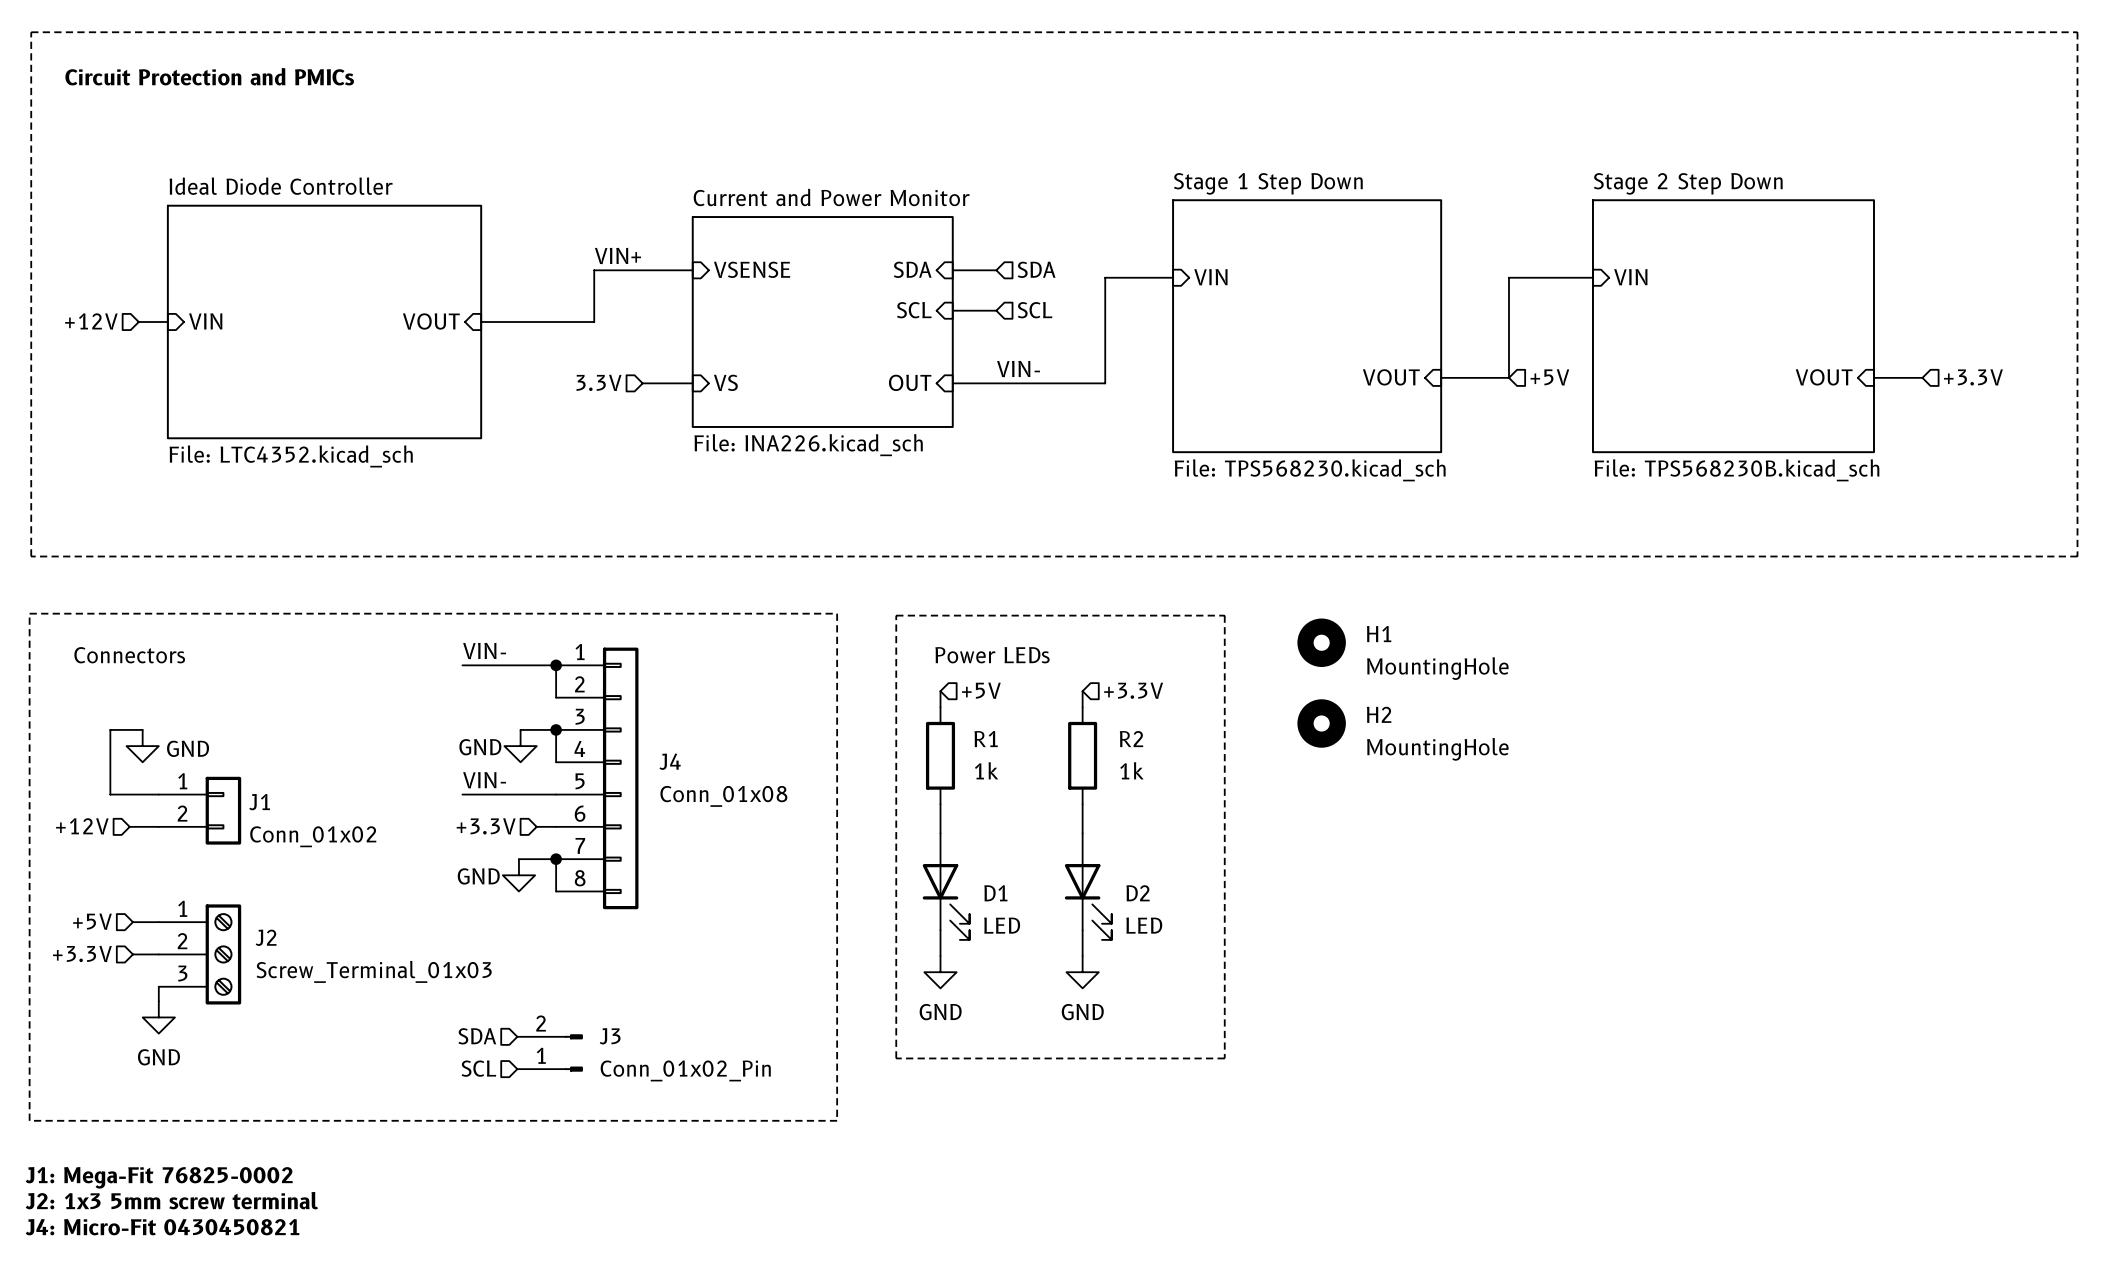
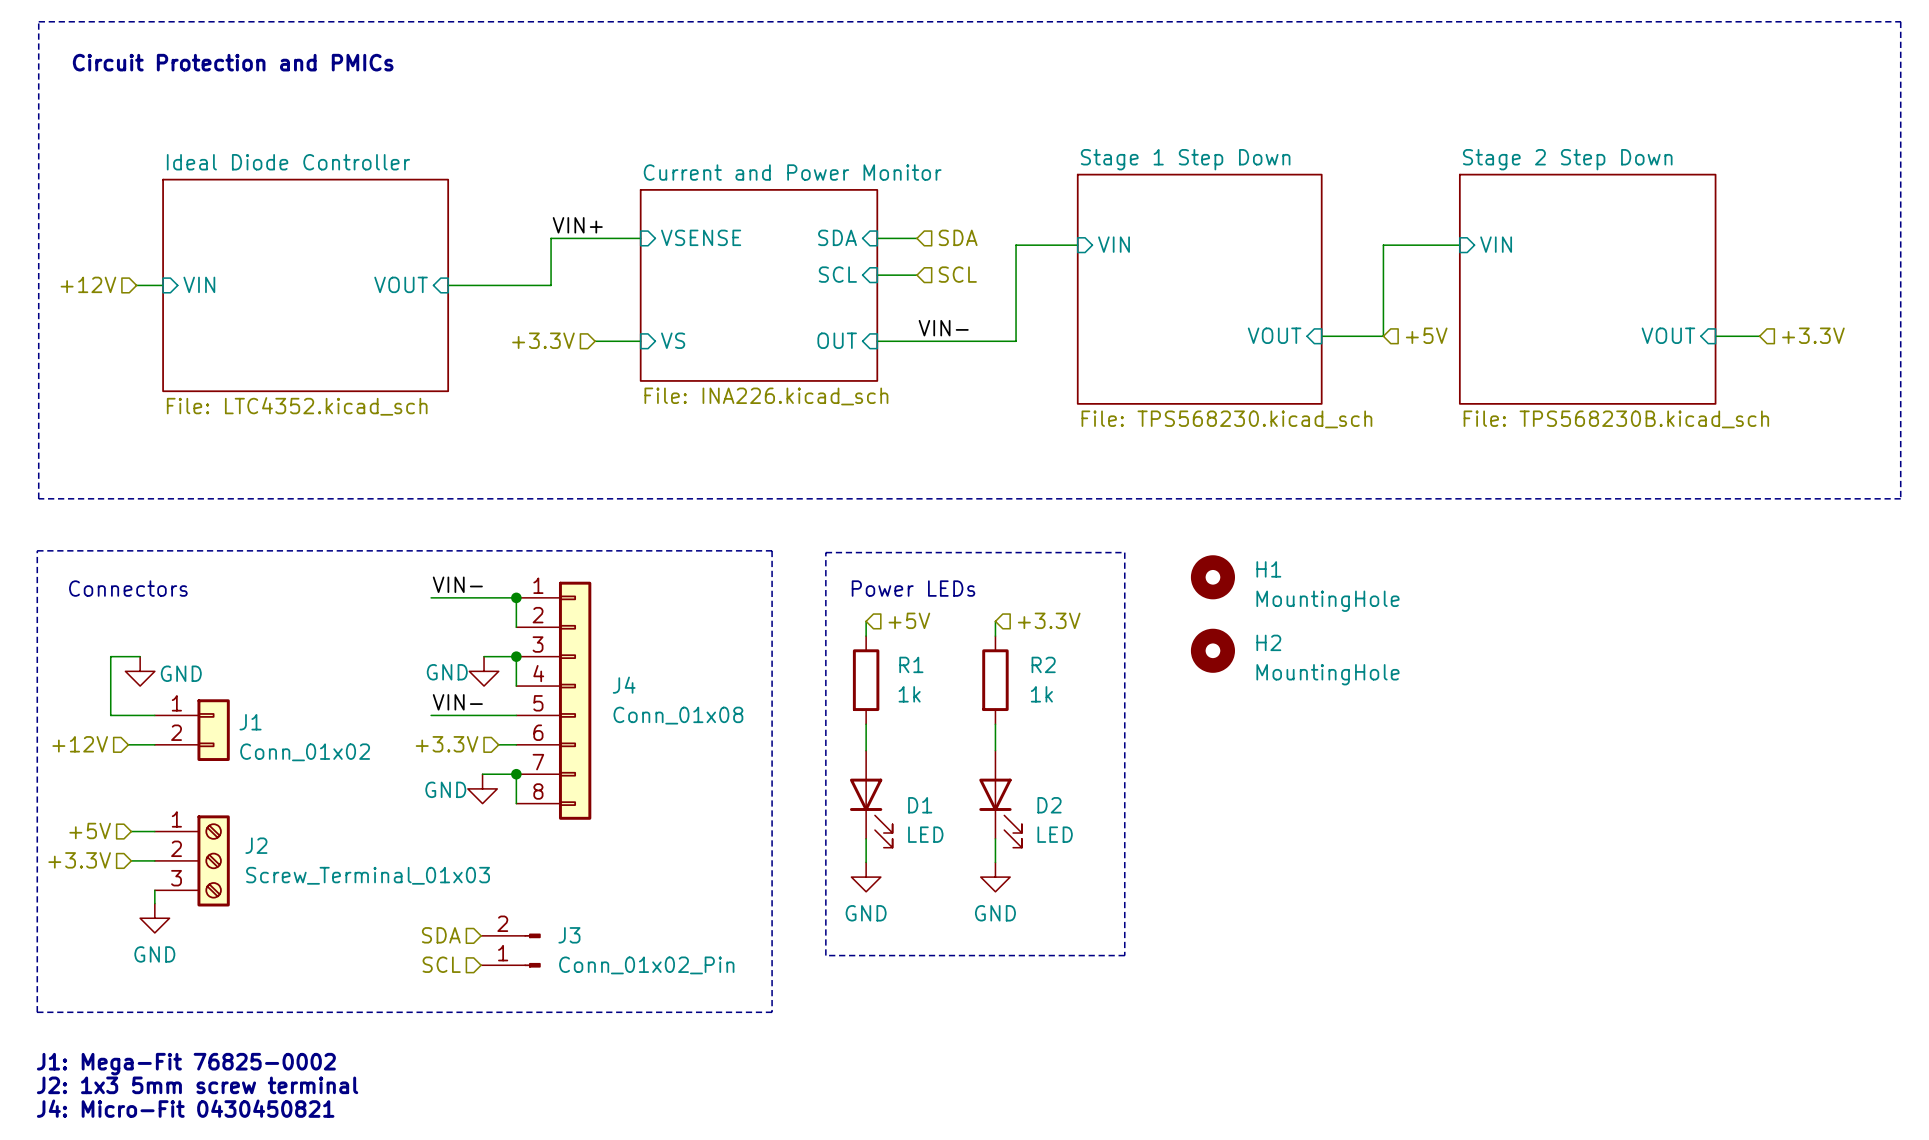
hierarchical label: 3.3V (599, 382) -> +3.3V (543, 340)

